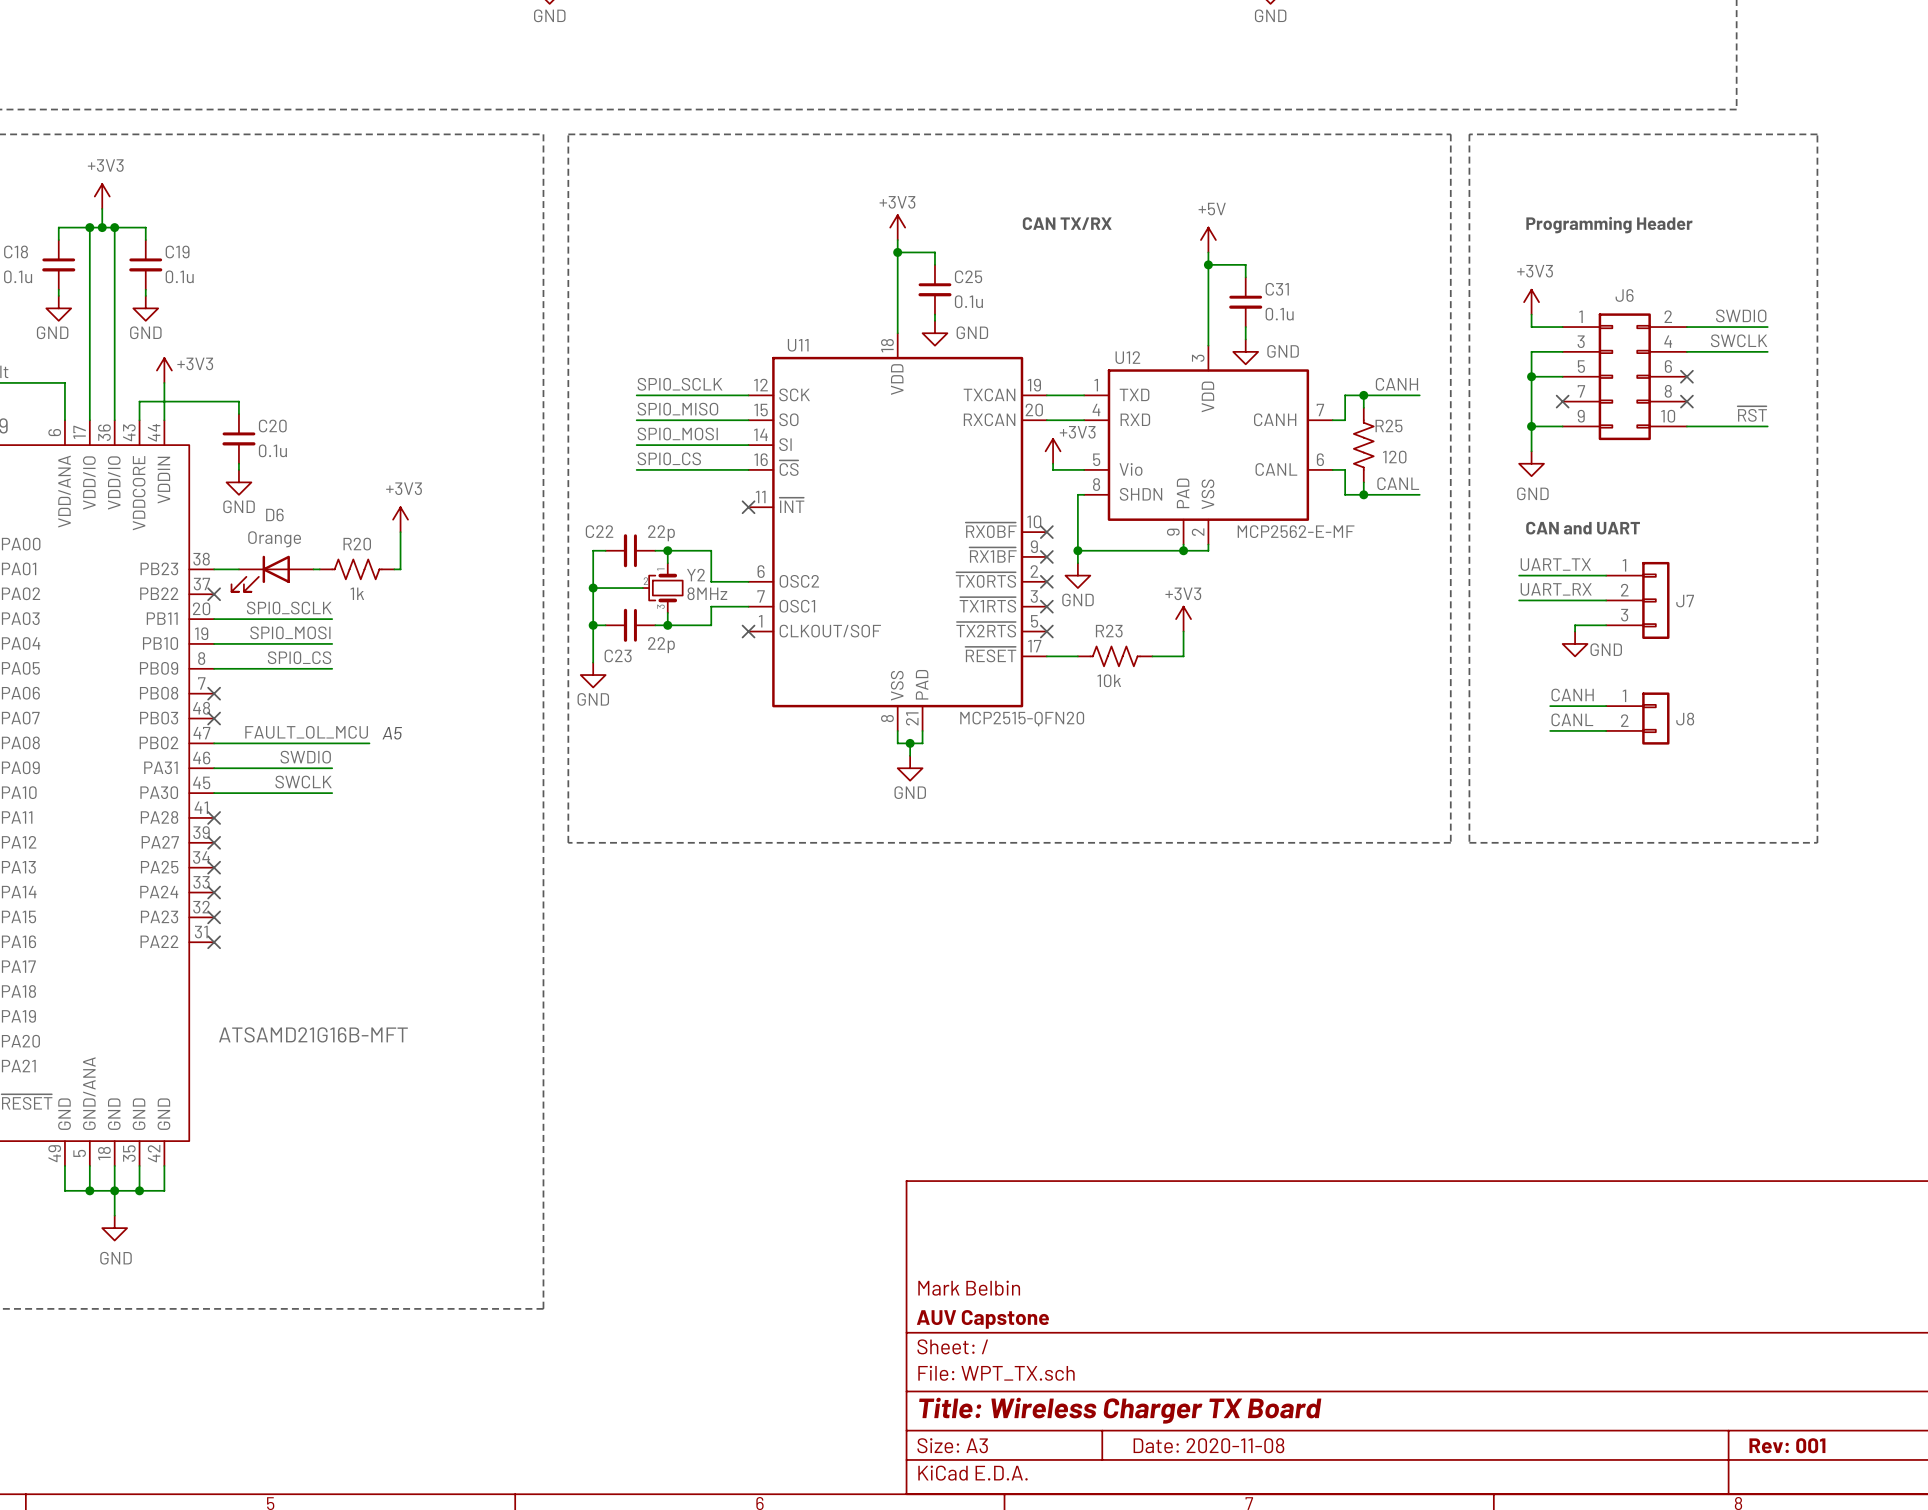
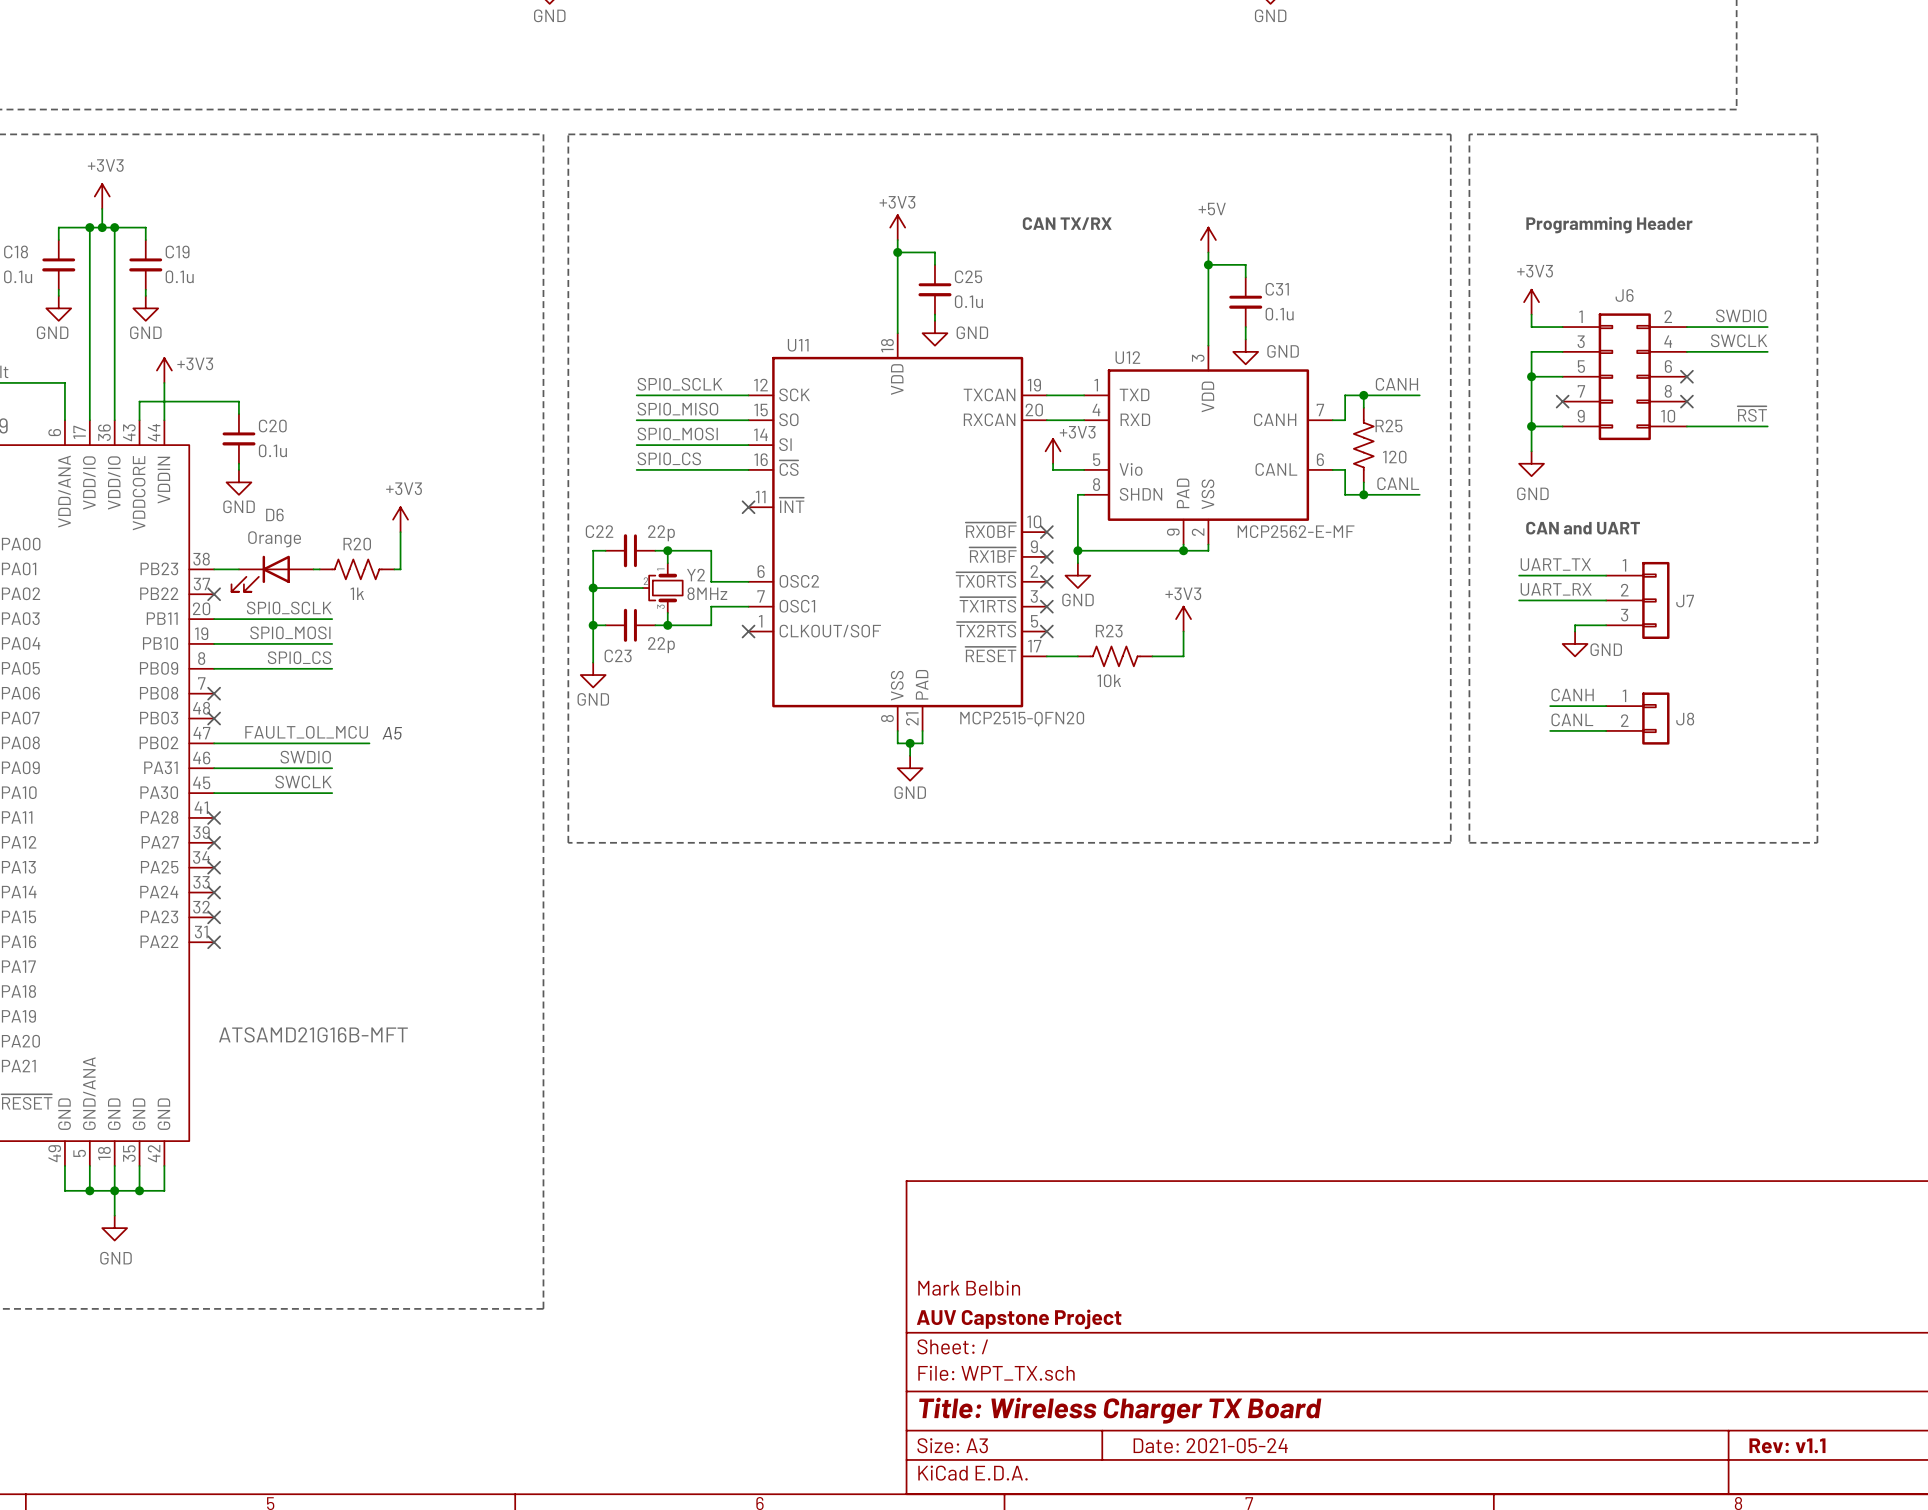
title block: AUV Capstone (982, 1319) -> AUV Capstone Project (1019, 1319)
title block: Date: 2020-11-08 (1208, 1445) -> Date: 2021-05-24 (1210, 1445)
title block: Rev: 001 (1787, 1445) -> Rev: v1.1 (1787, 1445)

